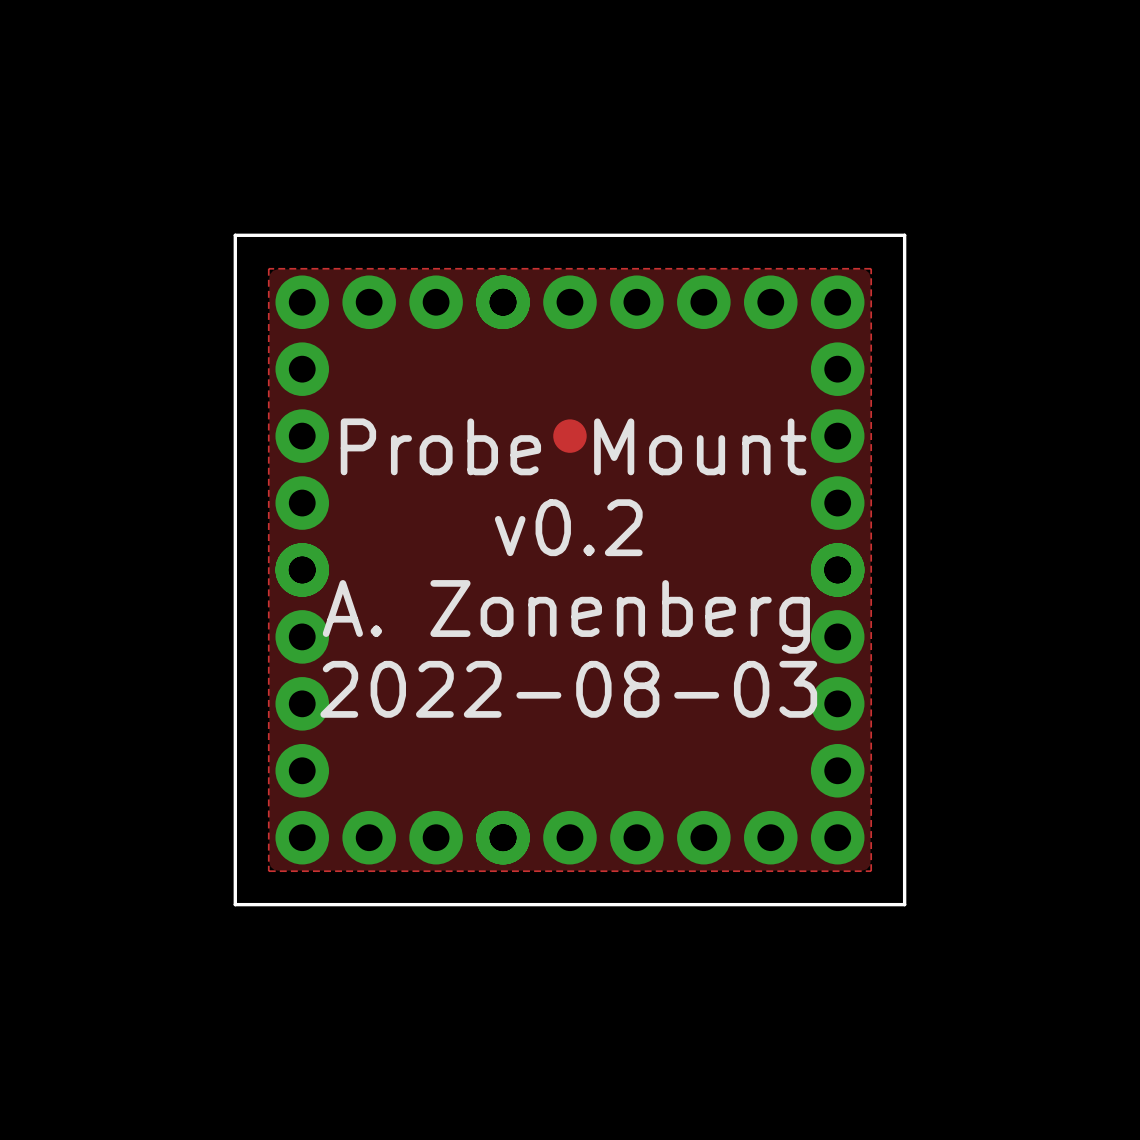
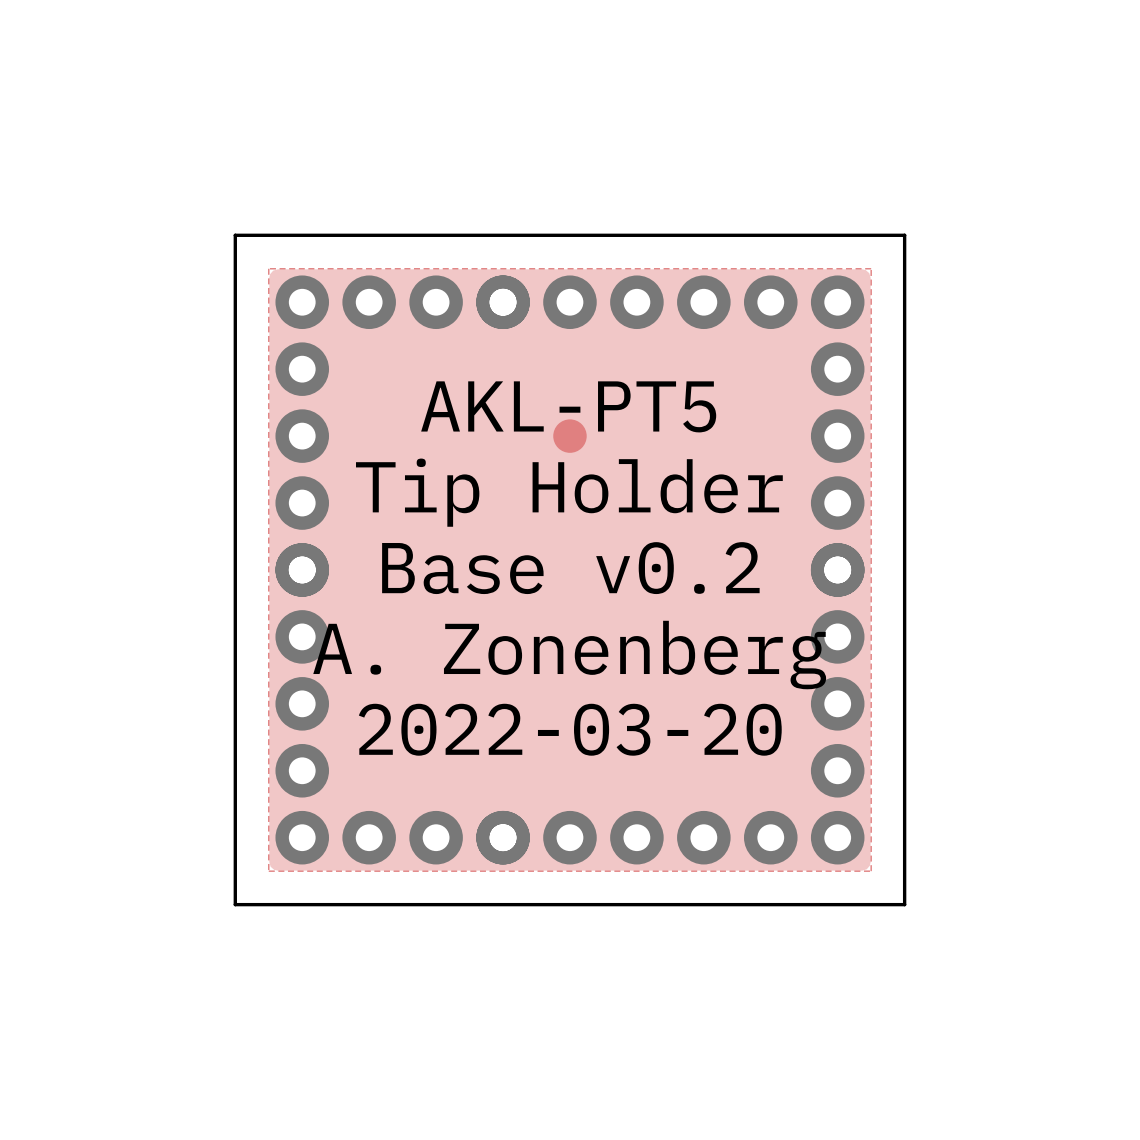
text: none -> AKL-PT5 (568, 406)
text: Probe Mount (573, 446) -> none
text: none -> Tip Holder (569, 492)
text: v0.2 (568, 527) -> Base v0.2 (570, 568)
text position: A. Zonenberg (566, 616) -> A. Zonenberg (569, 655)
text: 2022-08-03 (568, 689) -> 2022-03-20 (570, 729)

